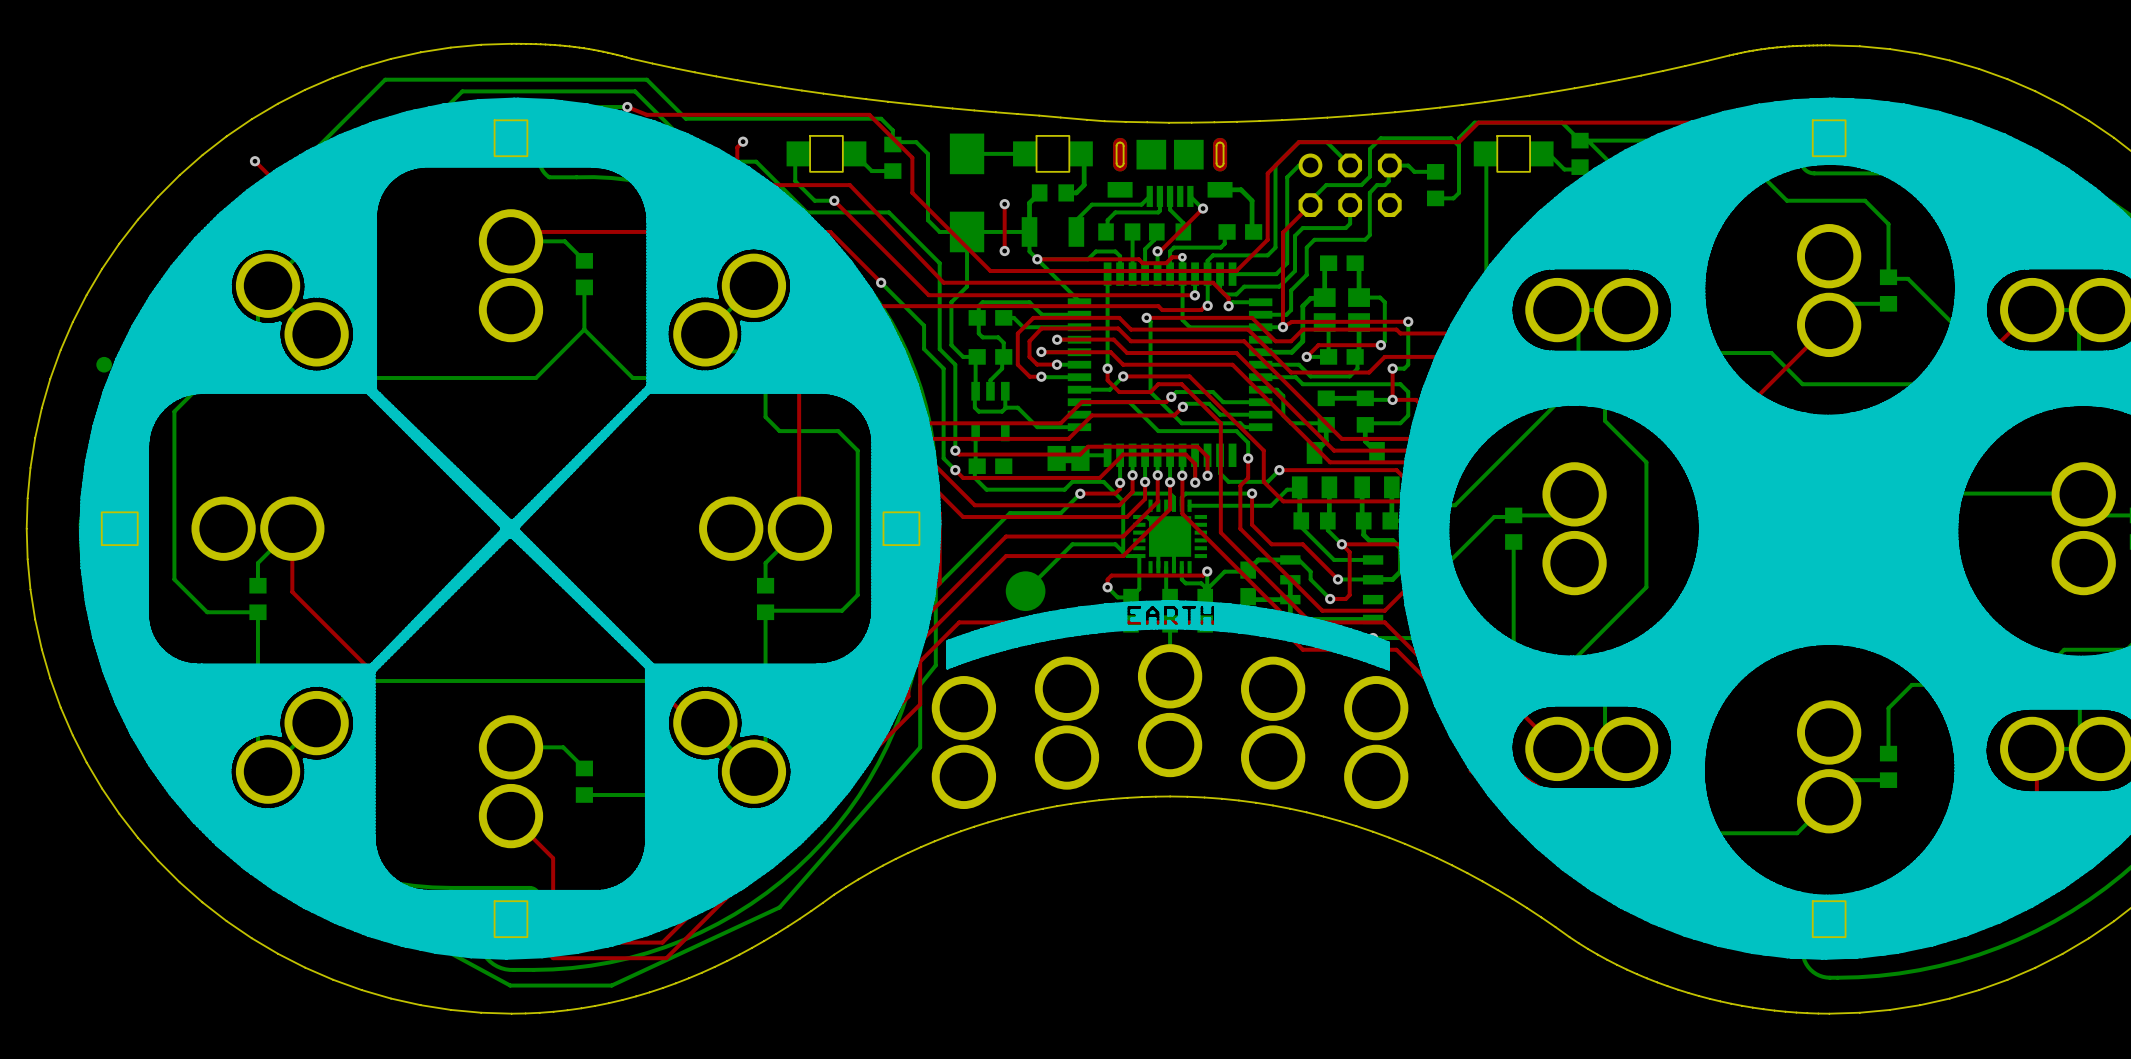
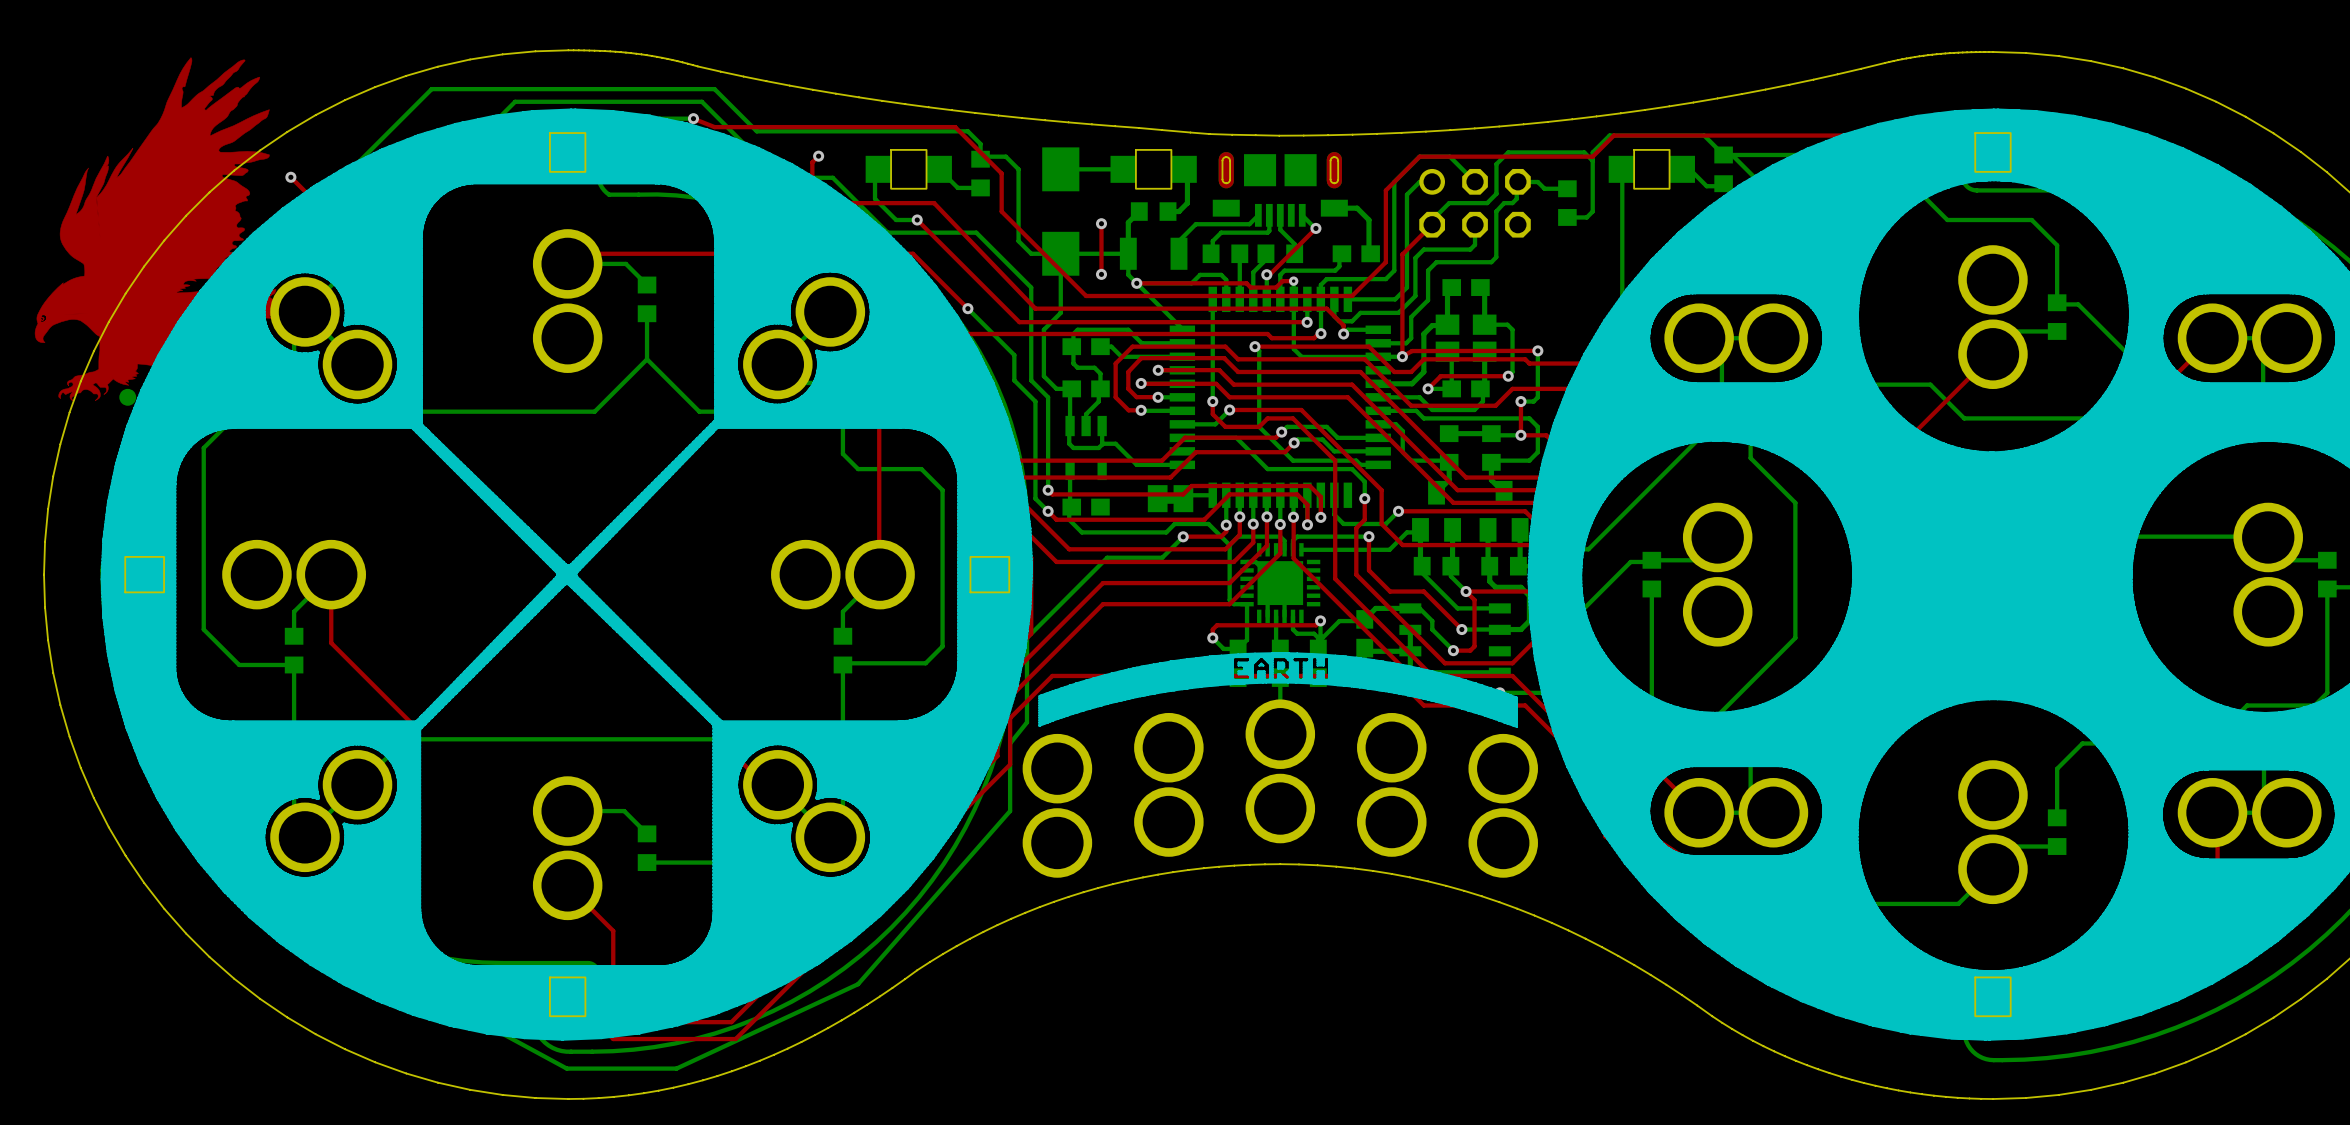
drawing: none -> [34, 57, 288, 402]
bottom track: (1123, 552) (1115, 544) (1072, 544) (1025, 591) -> none
part: (1025, 591) -> none

